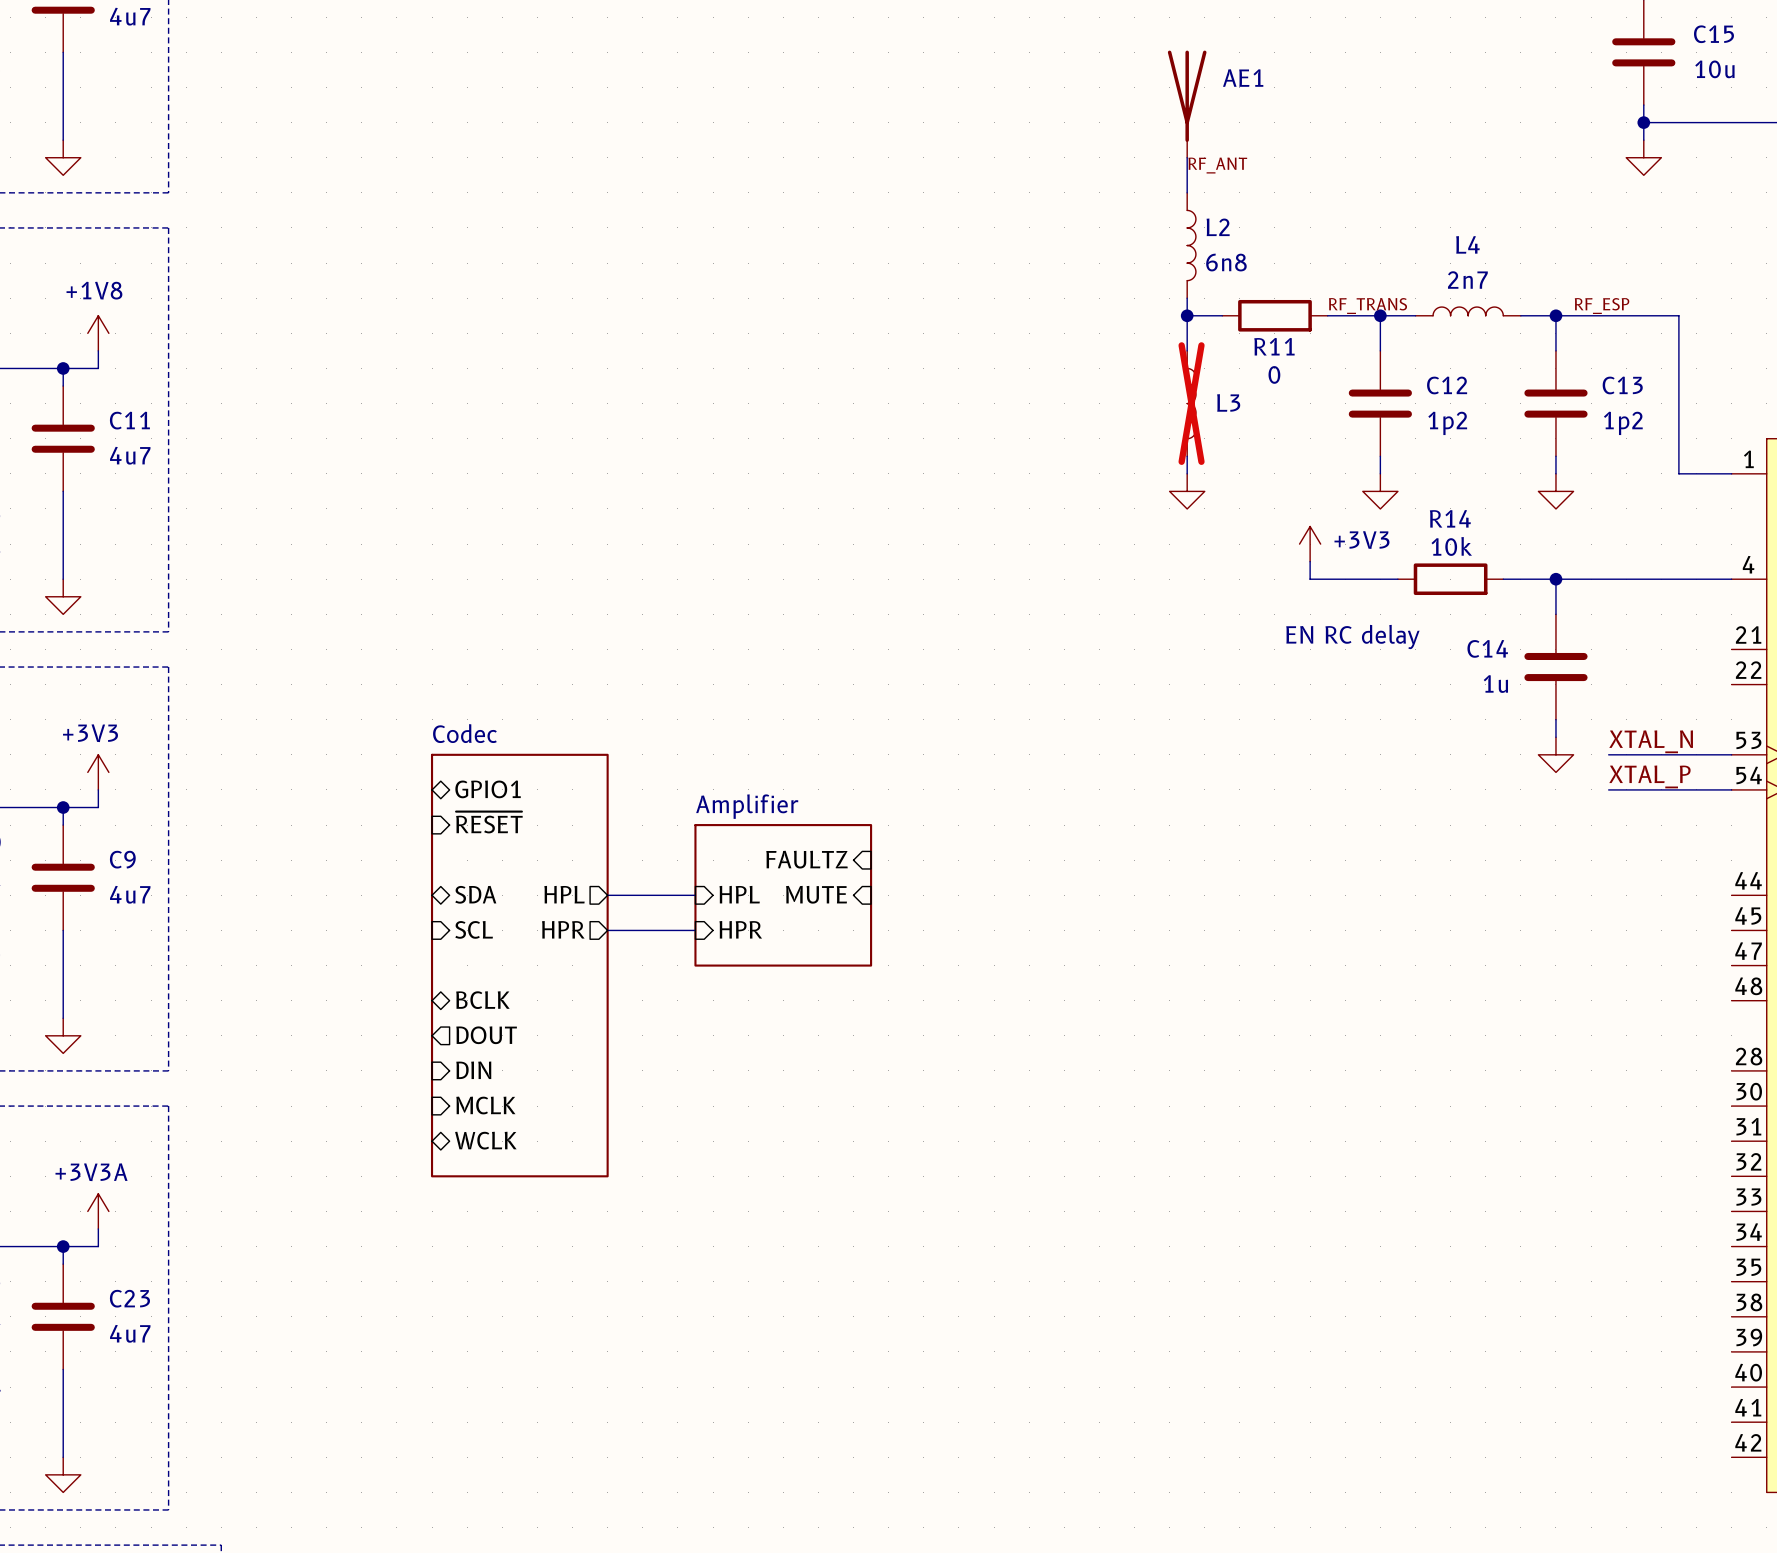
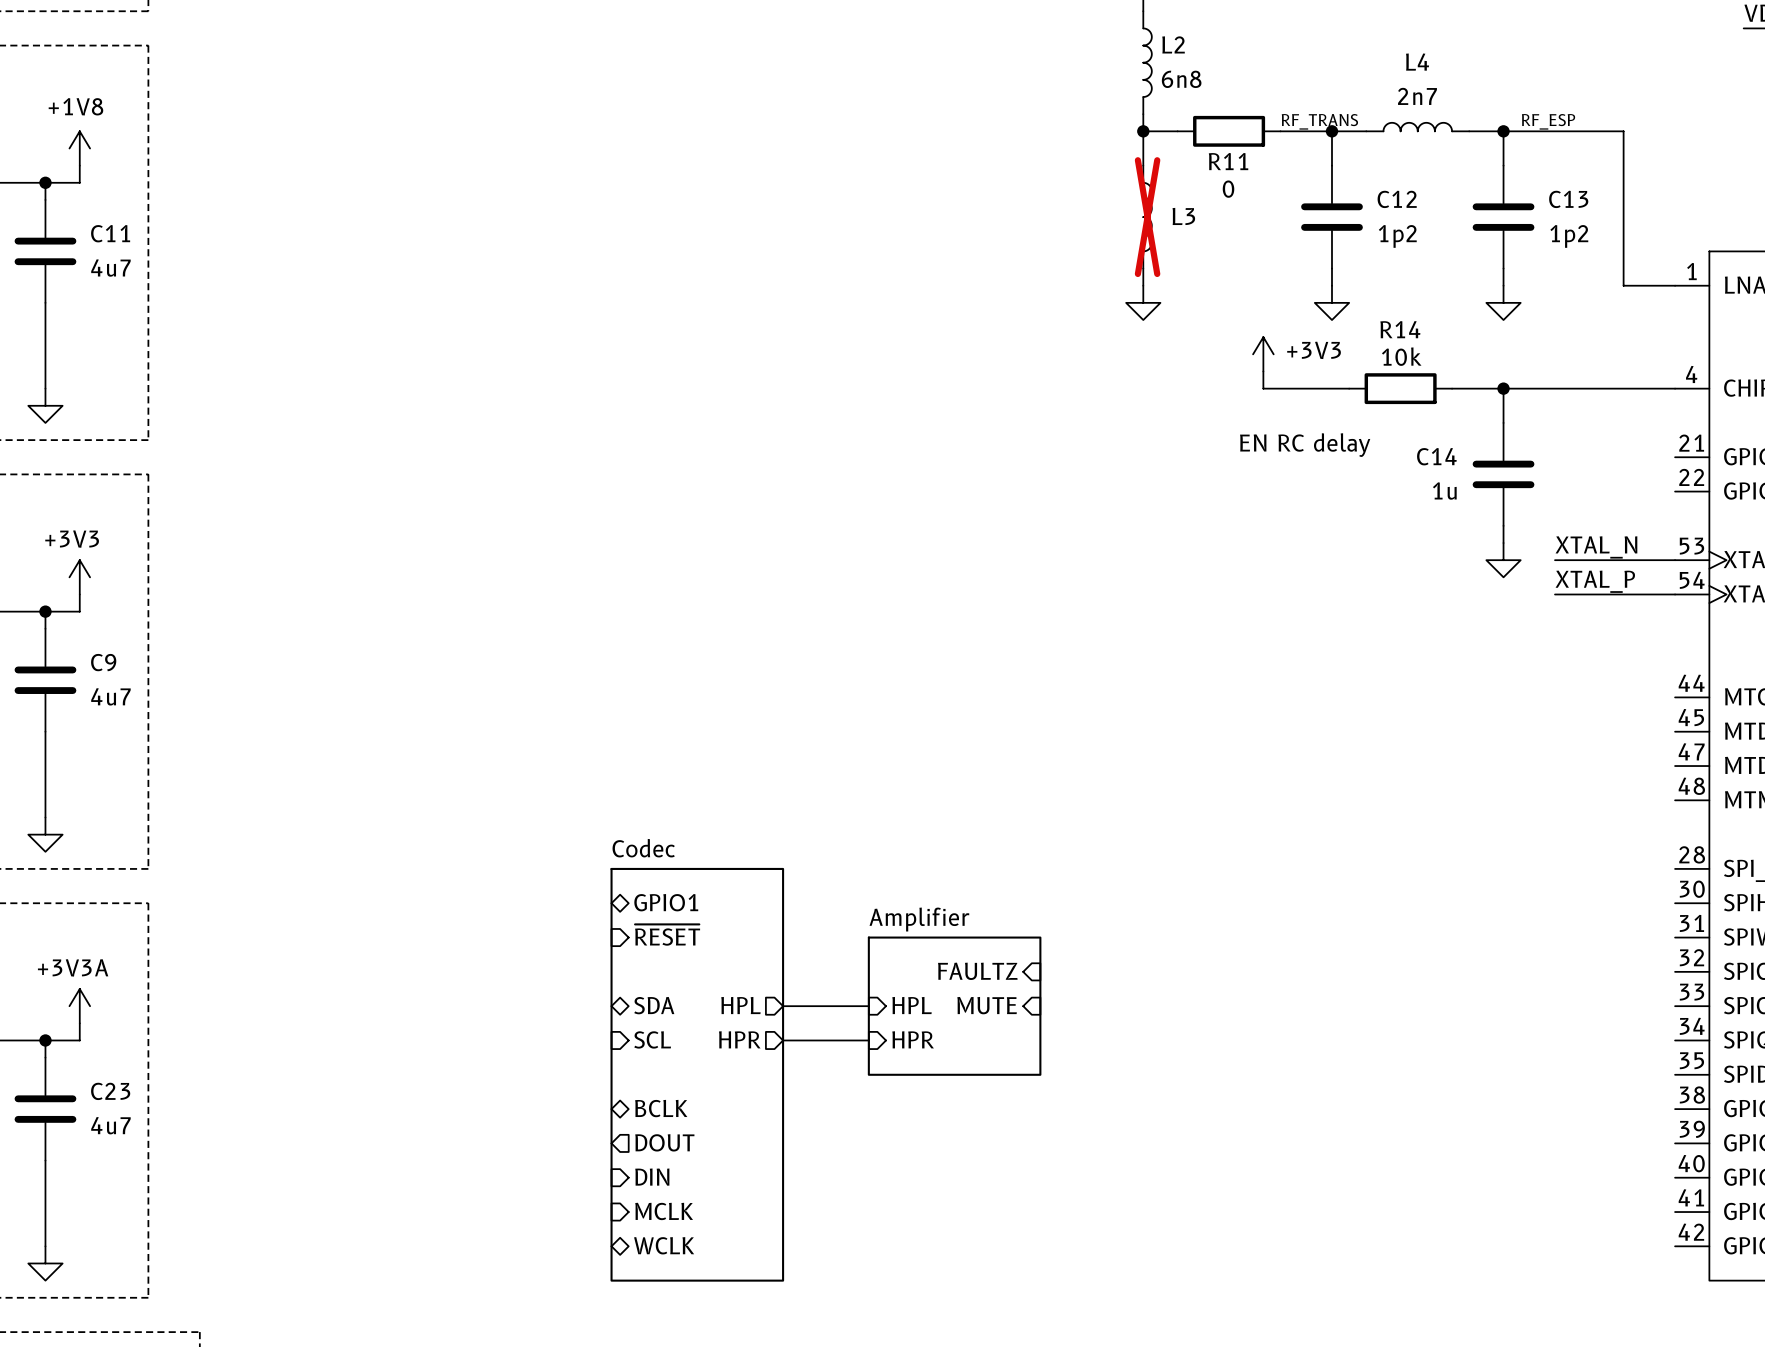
sheet pin: GPIO1 (488, 789) -> none
sheet pin: ~{RESET} (489, 822) -> none
sheet pin: FAULTZ (807, 859) -> none
sheet pin: SDA (475, 894) -> none
sheet pin: HPL (564, 894) -> none
sheet pin: HPL (739, 894) -> none
sheet pin: MUTE (816, 894) -> none
wire: (607, 895) (695, 895) -> none
sheet Amplifier: (783, 895) -> none
sheet pin: SCL (474, 929) -> none
sheet pin: HPR (563, 929) -> none
sheet pin: HPR (740, 929) -> none
wire: (607, 930) (695, 930) -> none
sheet Codec: (519, 965) -> none
sheet pin: BCLK (482, 1000) -> none
sheet pin: DOUT (486, 1035) -> none
sheet pin: DIN (473, 1070) -> none
sheet pin: MCLK (485, 1105) -> none
sheet pin: none -> GPIO1 (666, 902)
sheet pin: none -> ~{RESET} (667, 935)
sheet pin: WCLK (485, 1140) -> none
sheet pin: none -> FAULTZ (977, 971)
sheet pin: none -> SDA (654, 1005)
sheet pin: none -> HPL (740, 1005)
sheet pin: none -> HPL (912, 1005)
sheet pin: none -> MUTE (987, 1005)
wire: none -> (783, 1006) (868, 1006)
sheet Amplifier: none -> (954, 1006)
sheet pin: none -> HPR (739, 1039)
sheet pin: none -> HPR (913, 1039)
sheet pin: none -> SCL (652, 1039)
wire: none -> (783, 1040) (868, 1040)
sheet Codec: none -> (697, 1074)
sheet pin: none -> BCLK (661, 1108)
sheet pin: none -> DOUT (664, 1142)
sheet pin: none -> DIN (652, 1177)
sheet pin: none -> MCLK (664, 1211)
sheet pin: none -> WCLK (664, 1245)

